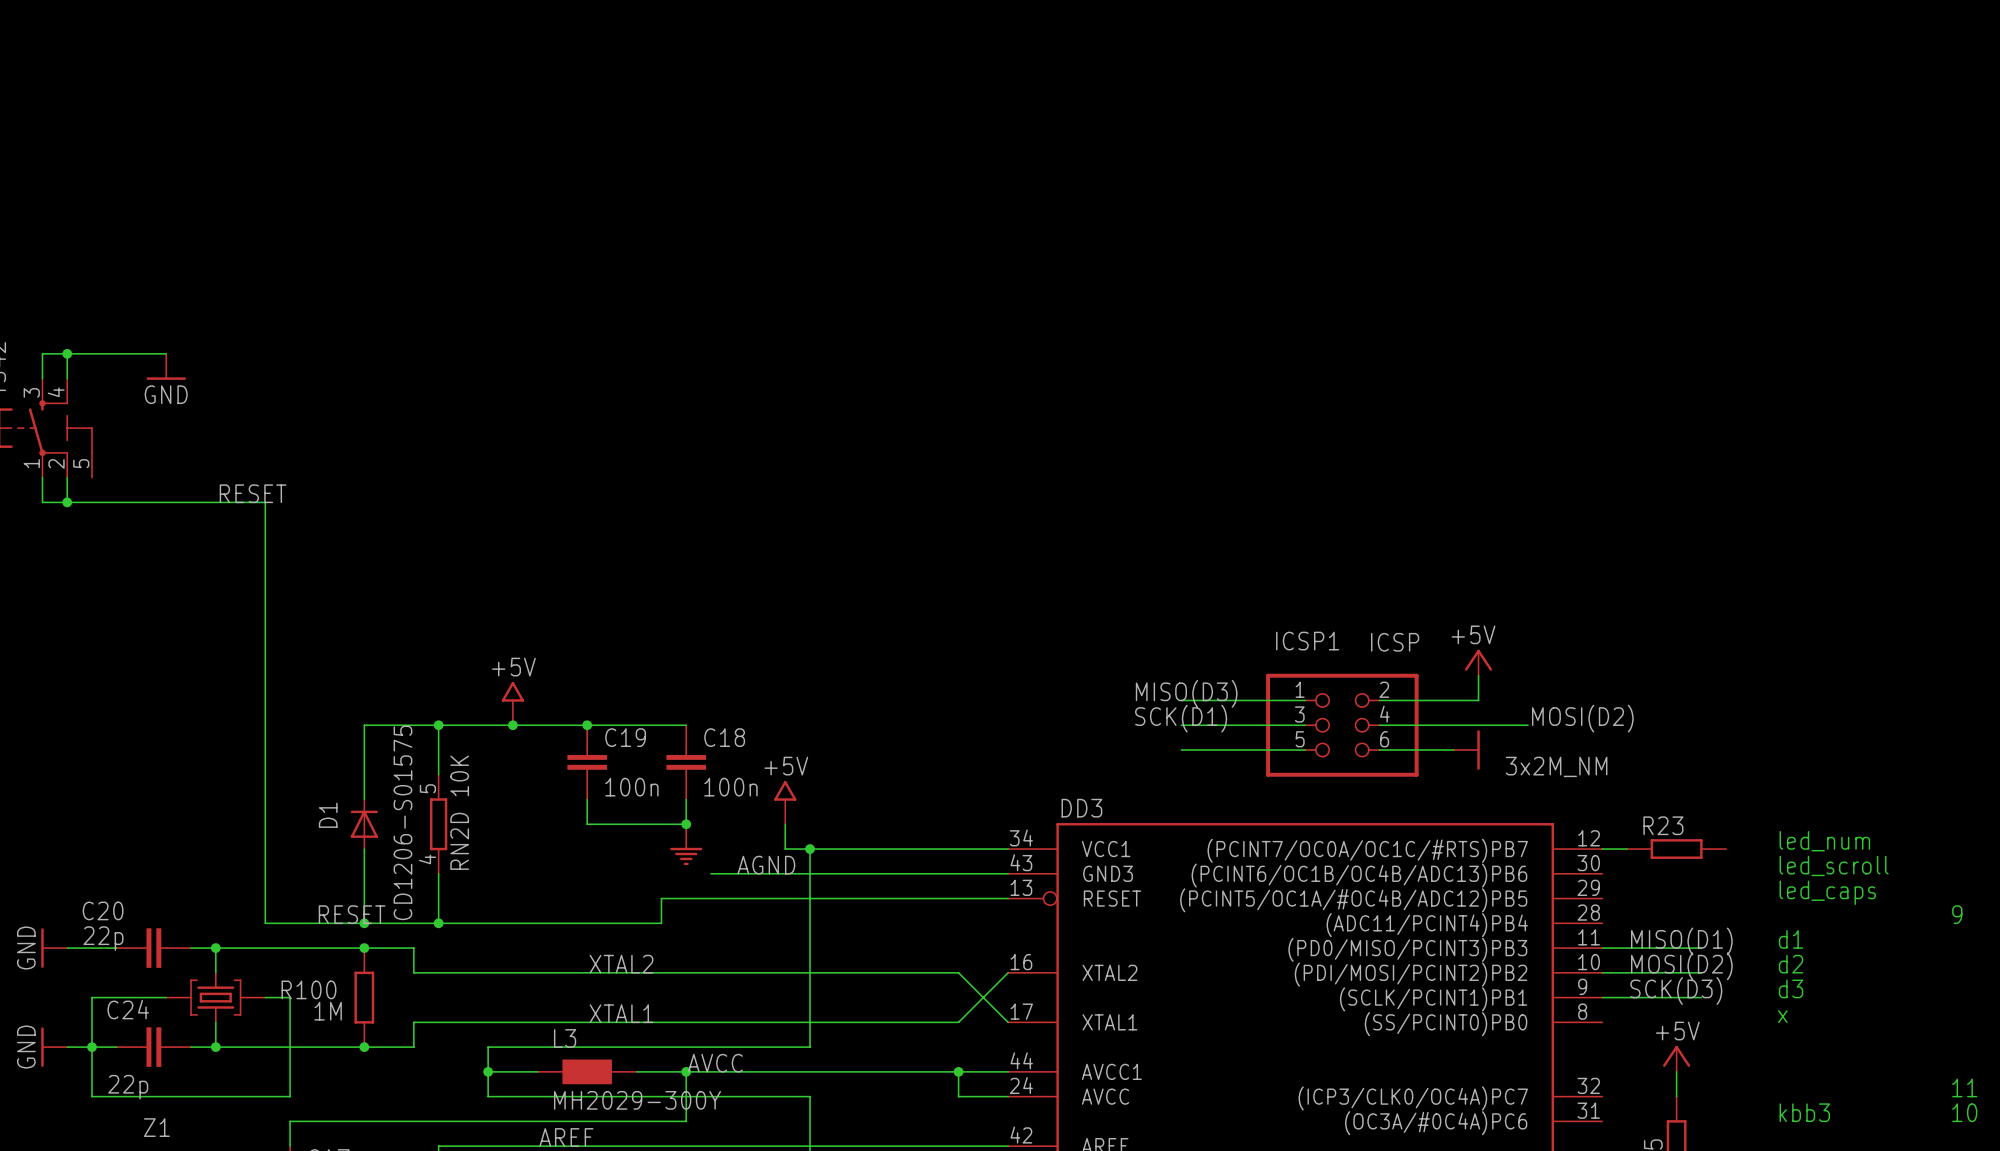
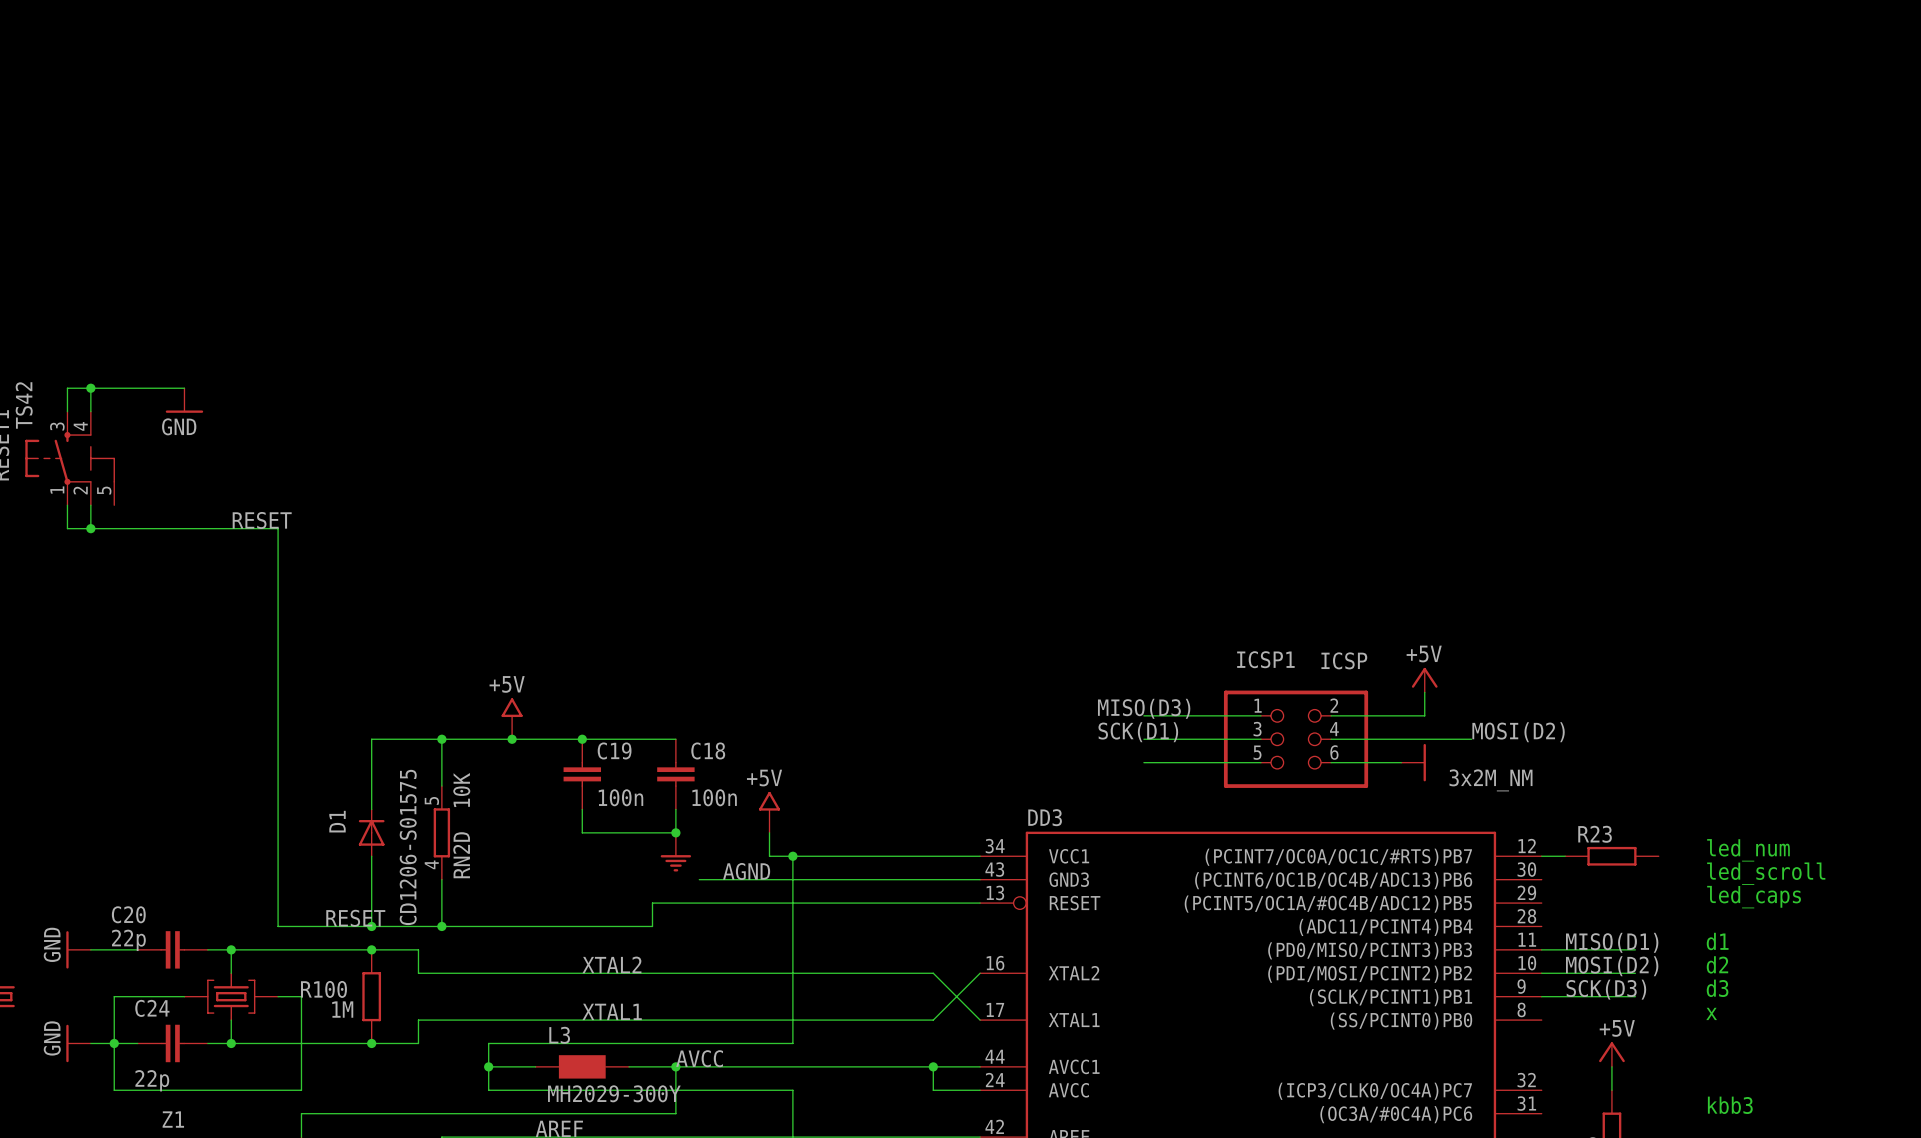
text: 9 (1957, 914) -> none
text: 11 (1964, 1087) -> none
text: 10 (1964, 1112) -> none

